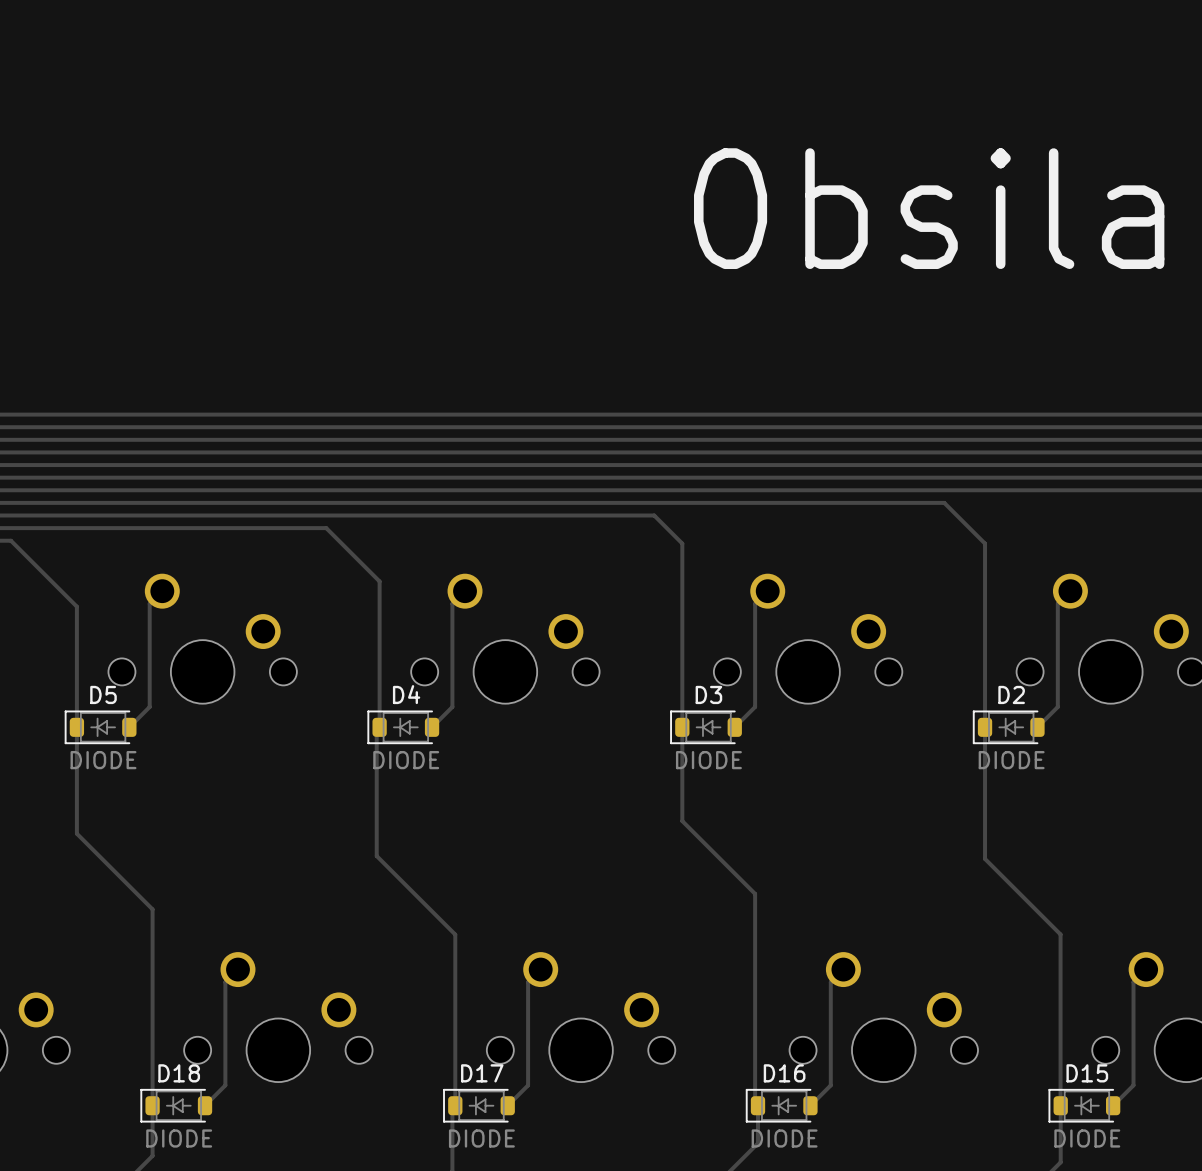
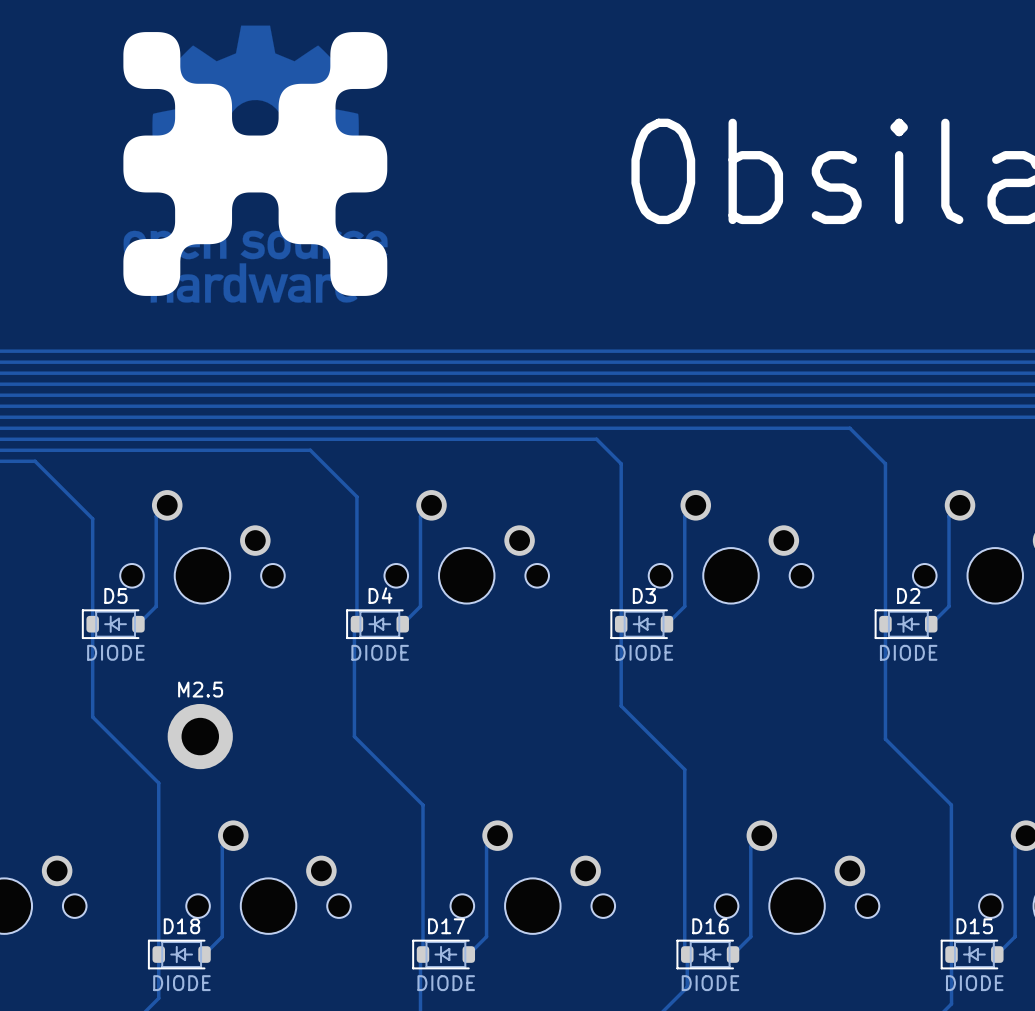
drawing: none -> [123, 25, 388, 303]
M2.5: none -> (200, 736)

